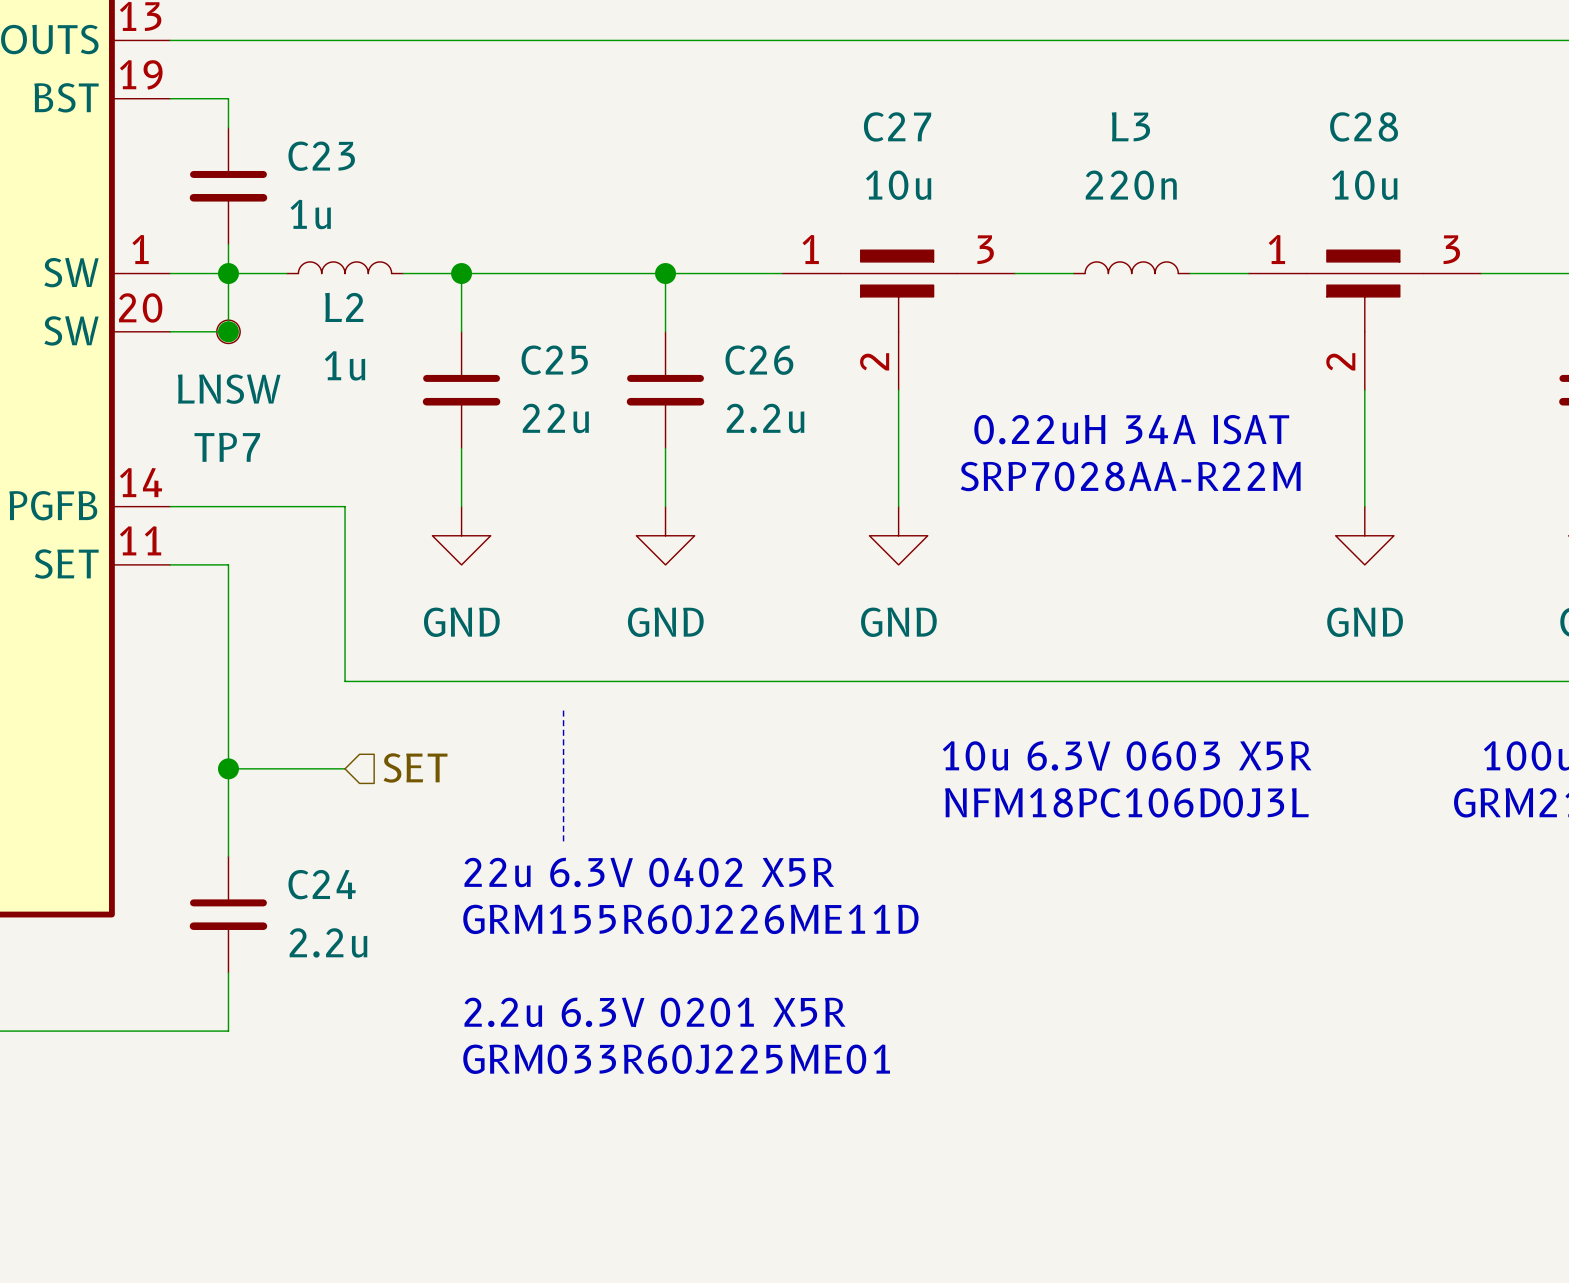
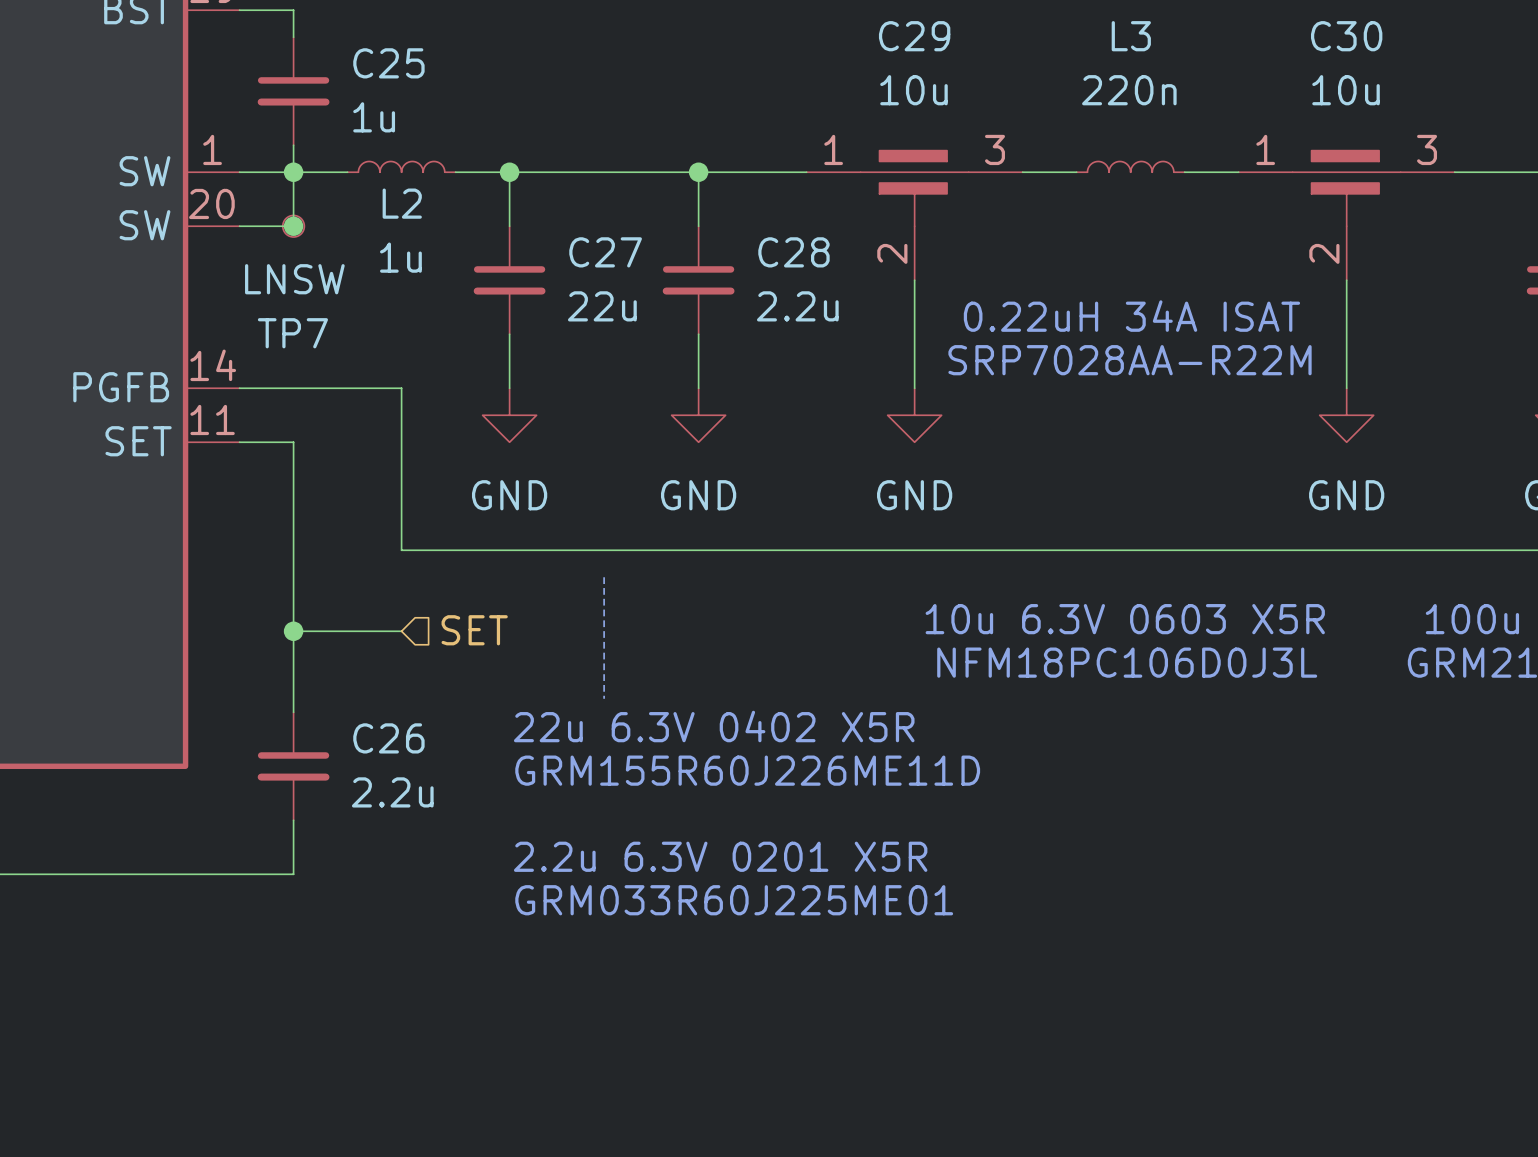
C27 name: C27 (897, 126) -> C29 (914, 36)
C28 name: C28 (1364, 126) -> C30 (1346, 36)
C23 name: C23 (321, 156) -> C25 (388, 63)
C25 name: C25 (554, 360) -> C27 (605, 252)
C26 name: C26 (759, 360) -> C28 (793, 252)
C24 name: C24 (322, 884) -> C26 (388, 738)

